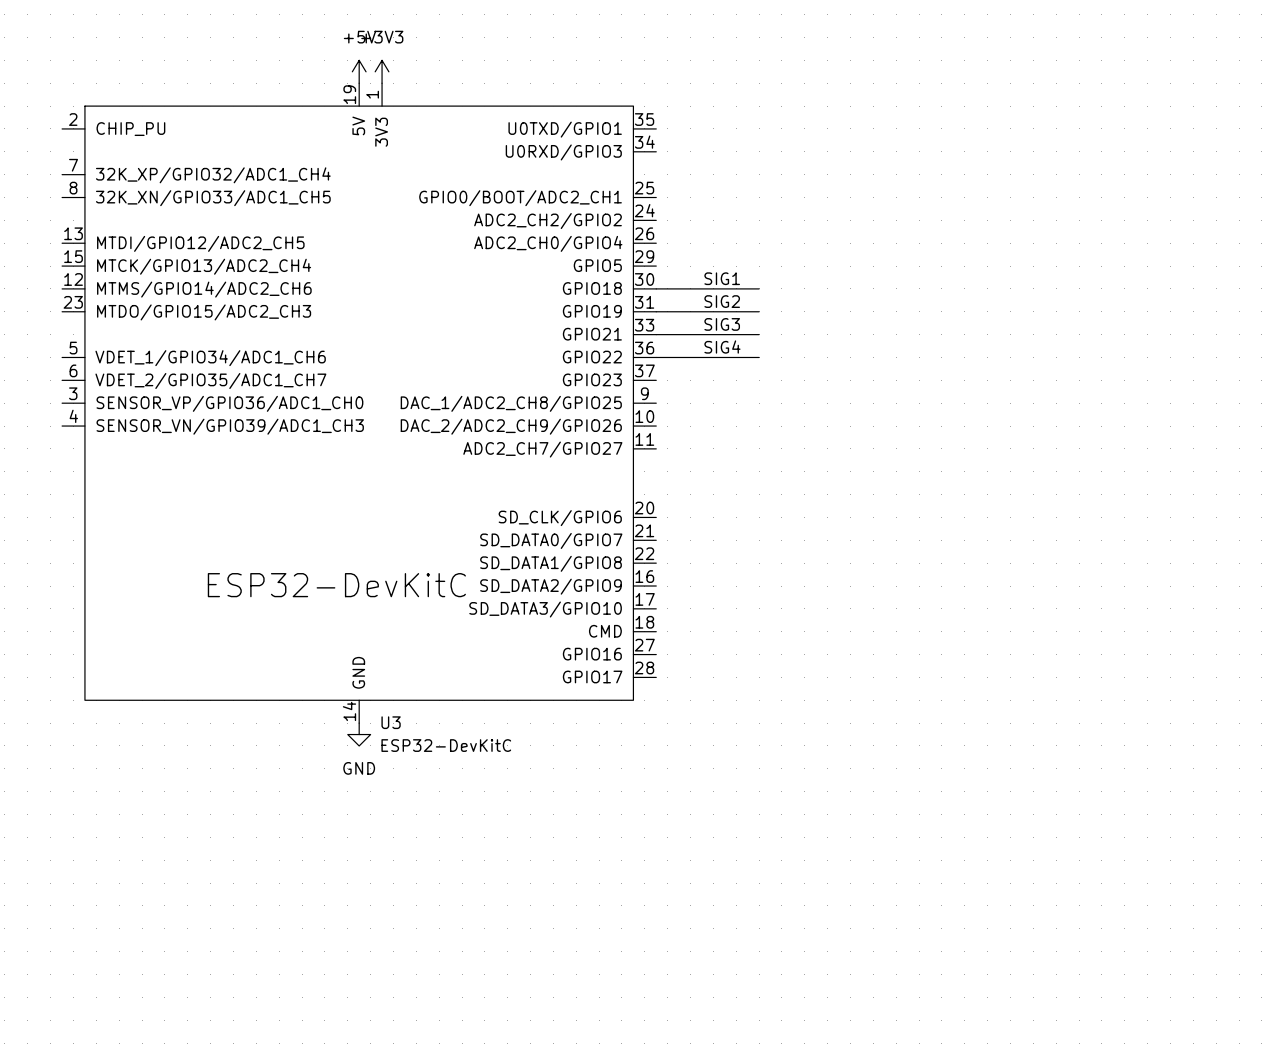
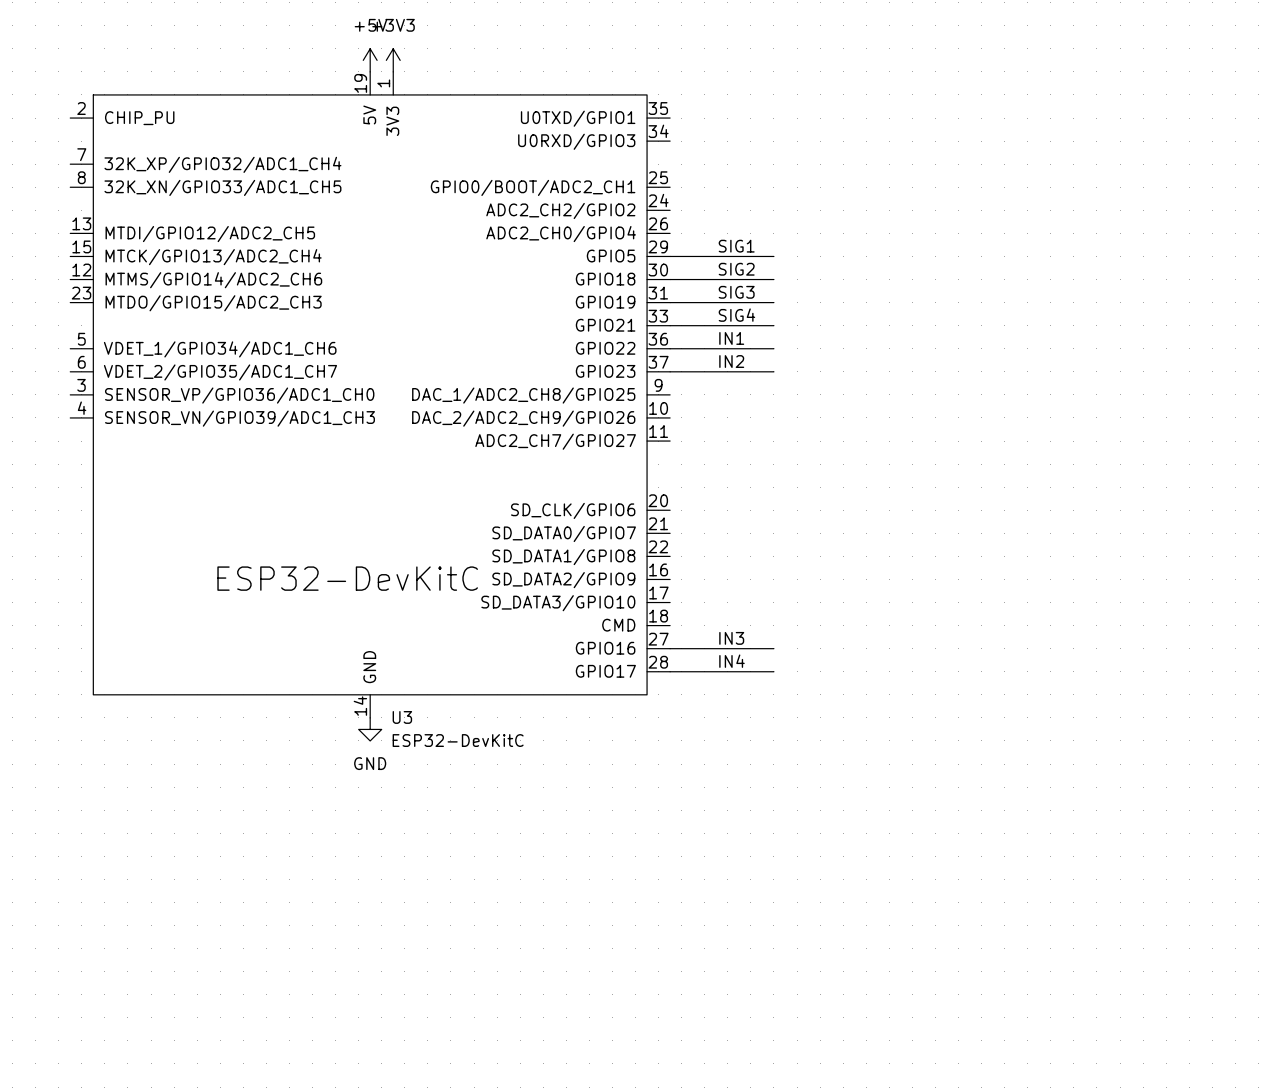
label: none -> SIG1 (736, 246)
wire: none -> (670, 256) (773, 256)
label: SIG1 (722, 278) -> SIG2 (736, 269)
label: SIG2 (722, 301) -> SIG3 (736, 292)
label: SIG3 (722, 324) -> SIG4 (736, 315)
label: SIG4 (722, 347) -> IN1 (731, 338)
label: none -> IN2 (731, 361)
wire: none -> (670, 371) (773, 371)
label: none -> IN3 (731, 638)
wire: none -> (670, 648) (773, 648)
label: none -> IN4 (732, 661)
wire: none -> (670, 671) (773, 671)

